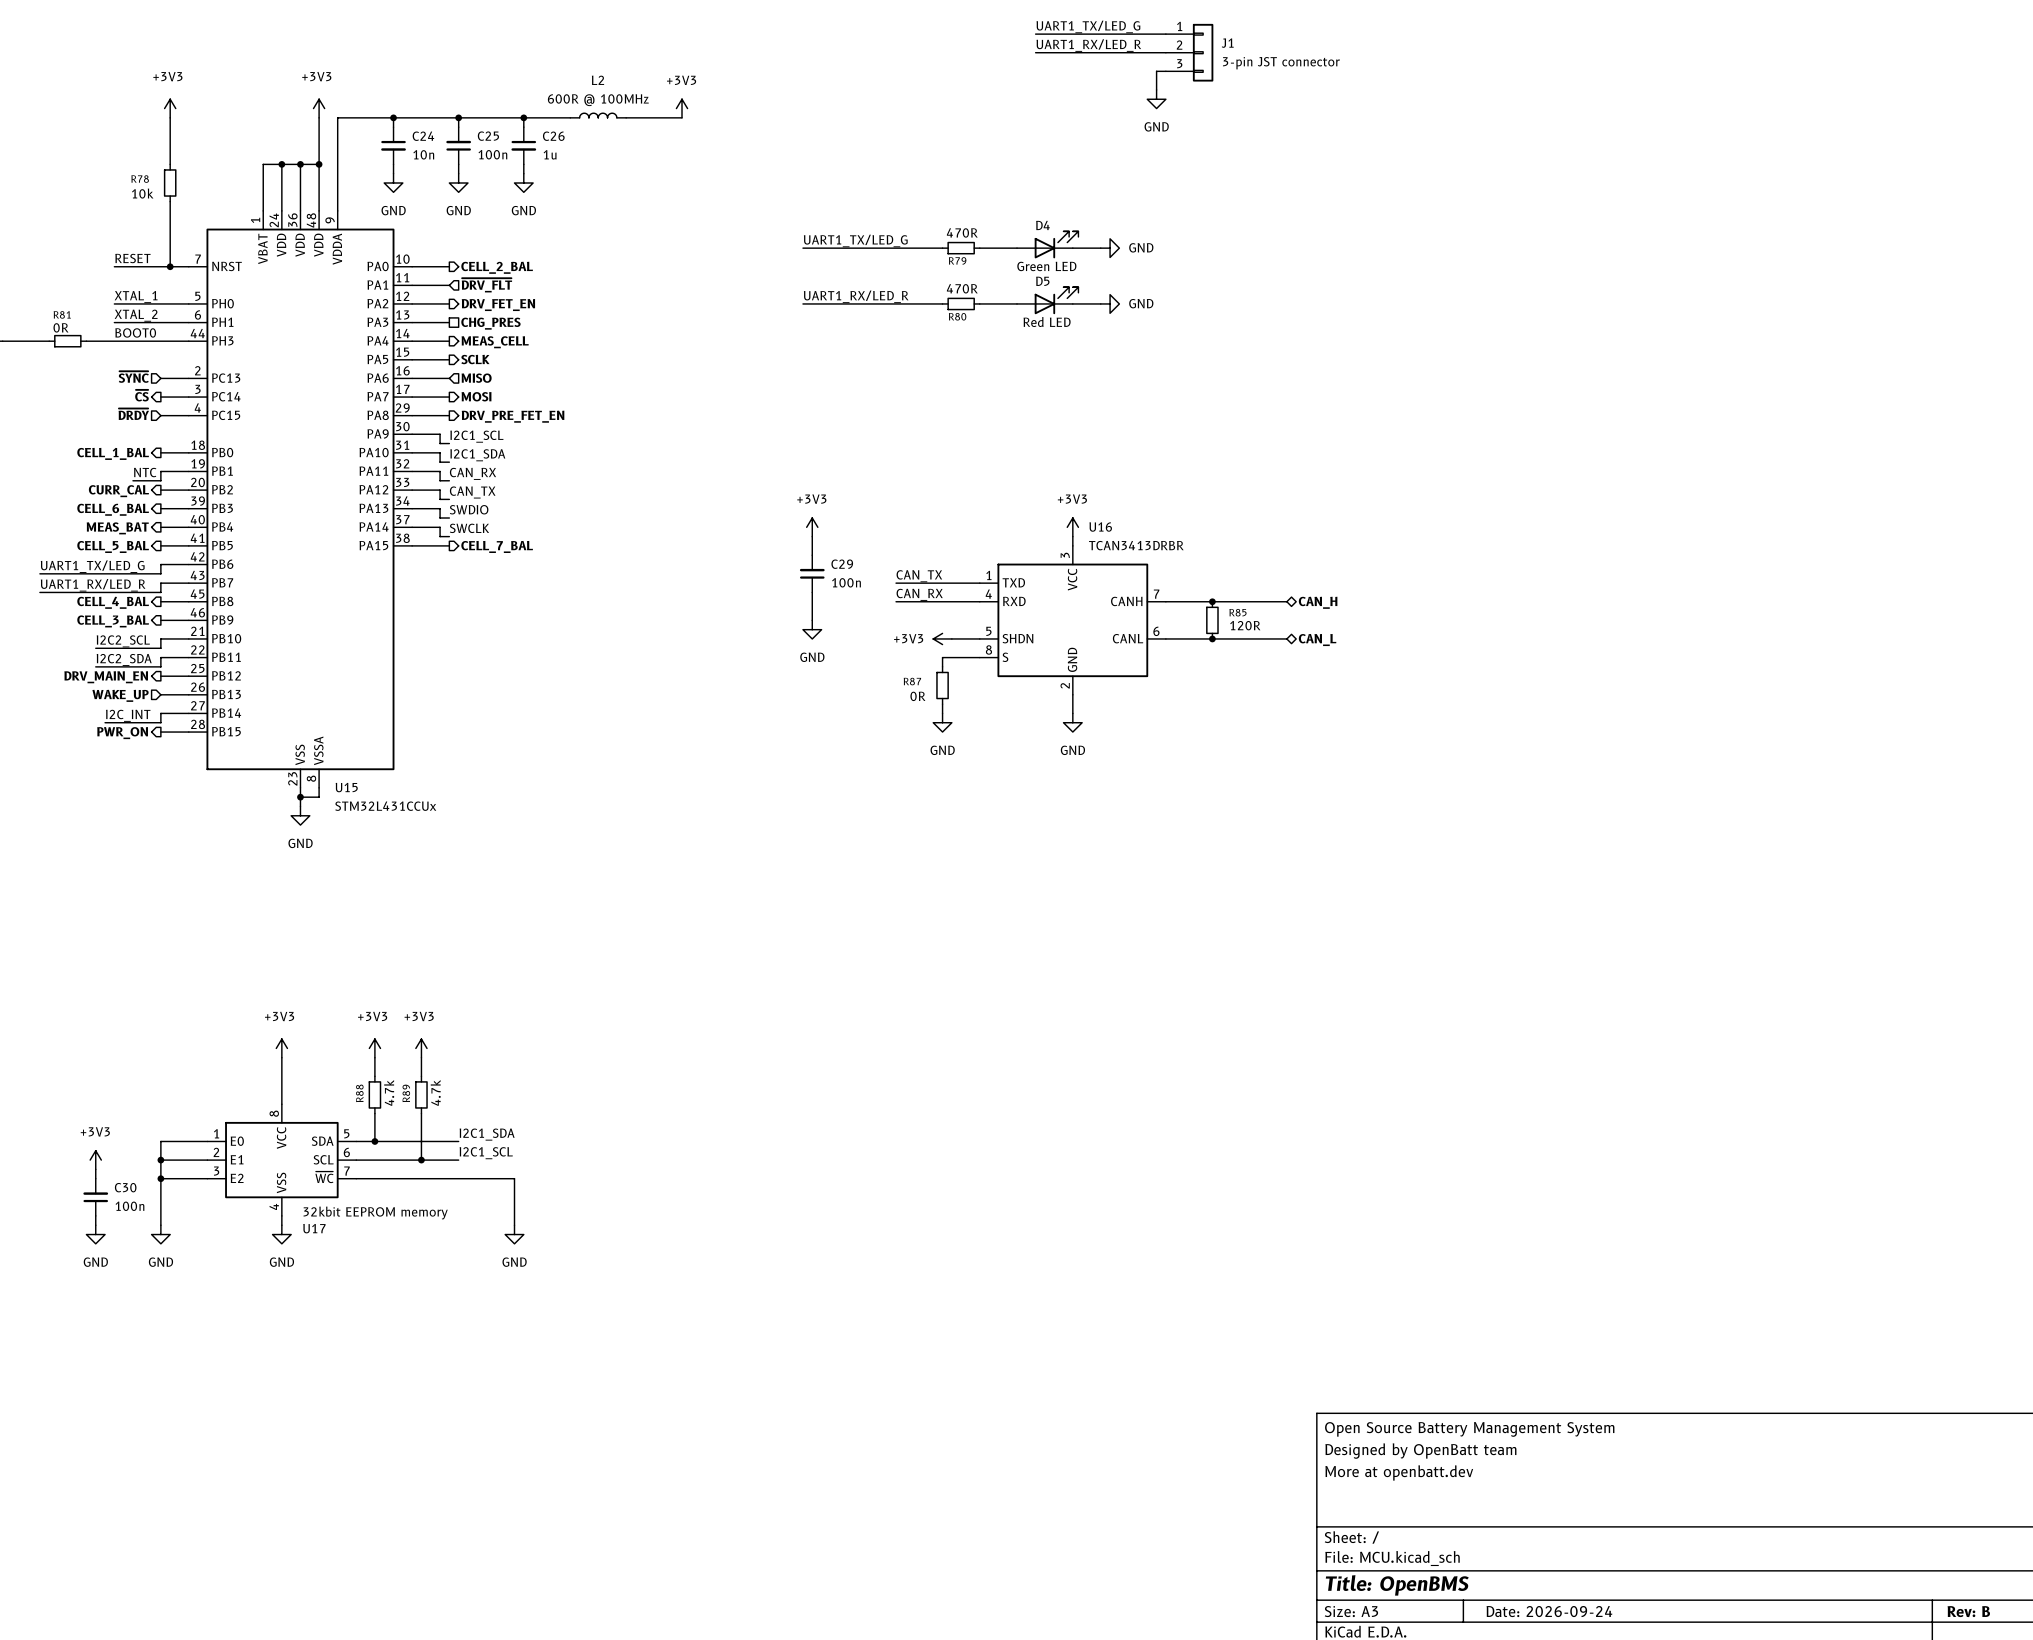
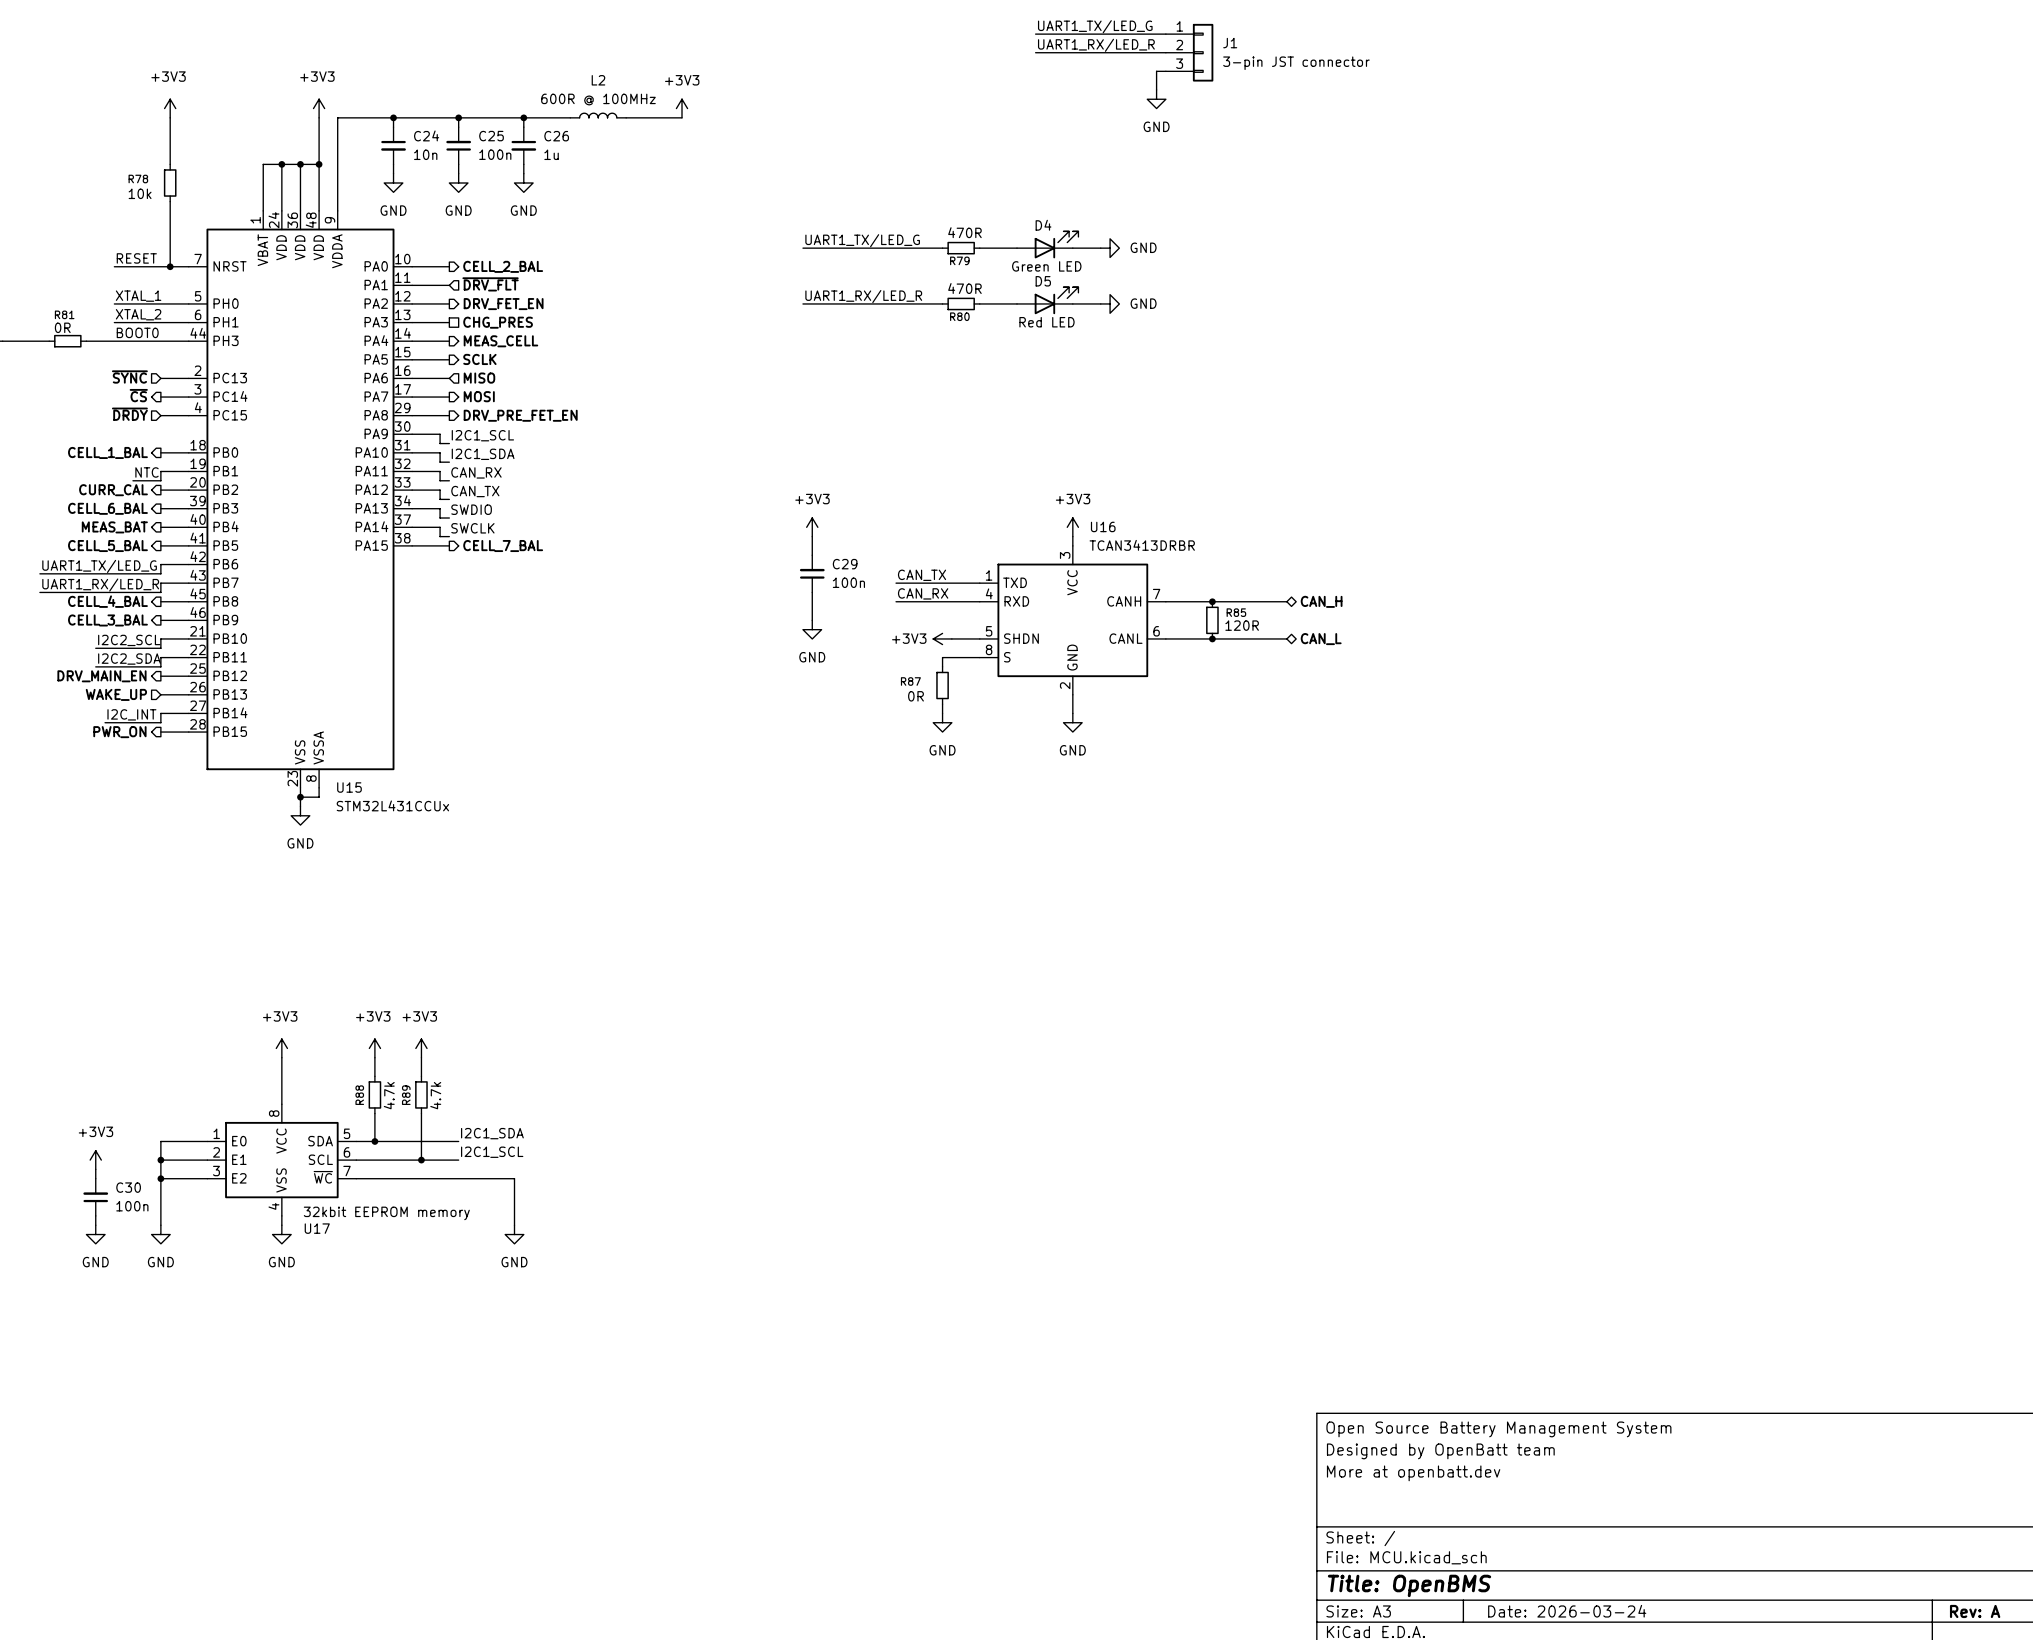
title block: Date: 2026-09-24 (1549, 1611) -> Date: 2026-03-24 (1567, 1611)
title block: Rev: B (1968, 1611) -> Rev: A (1975, 1611)

